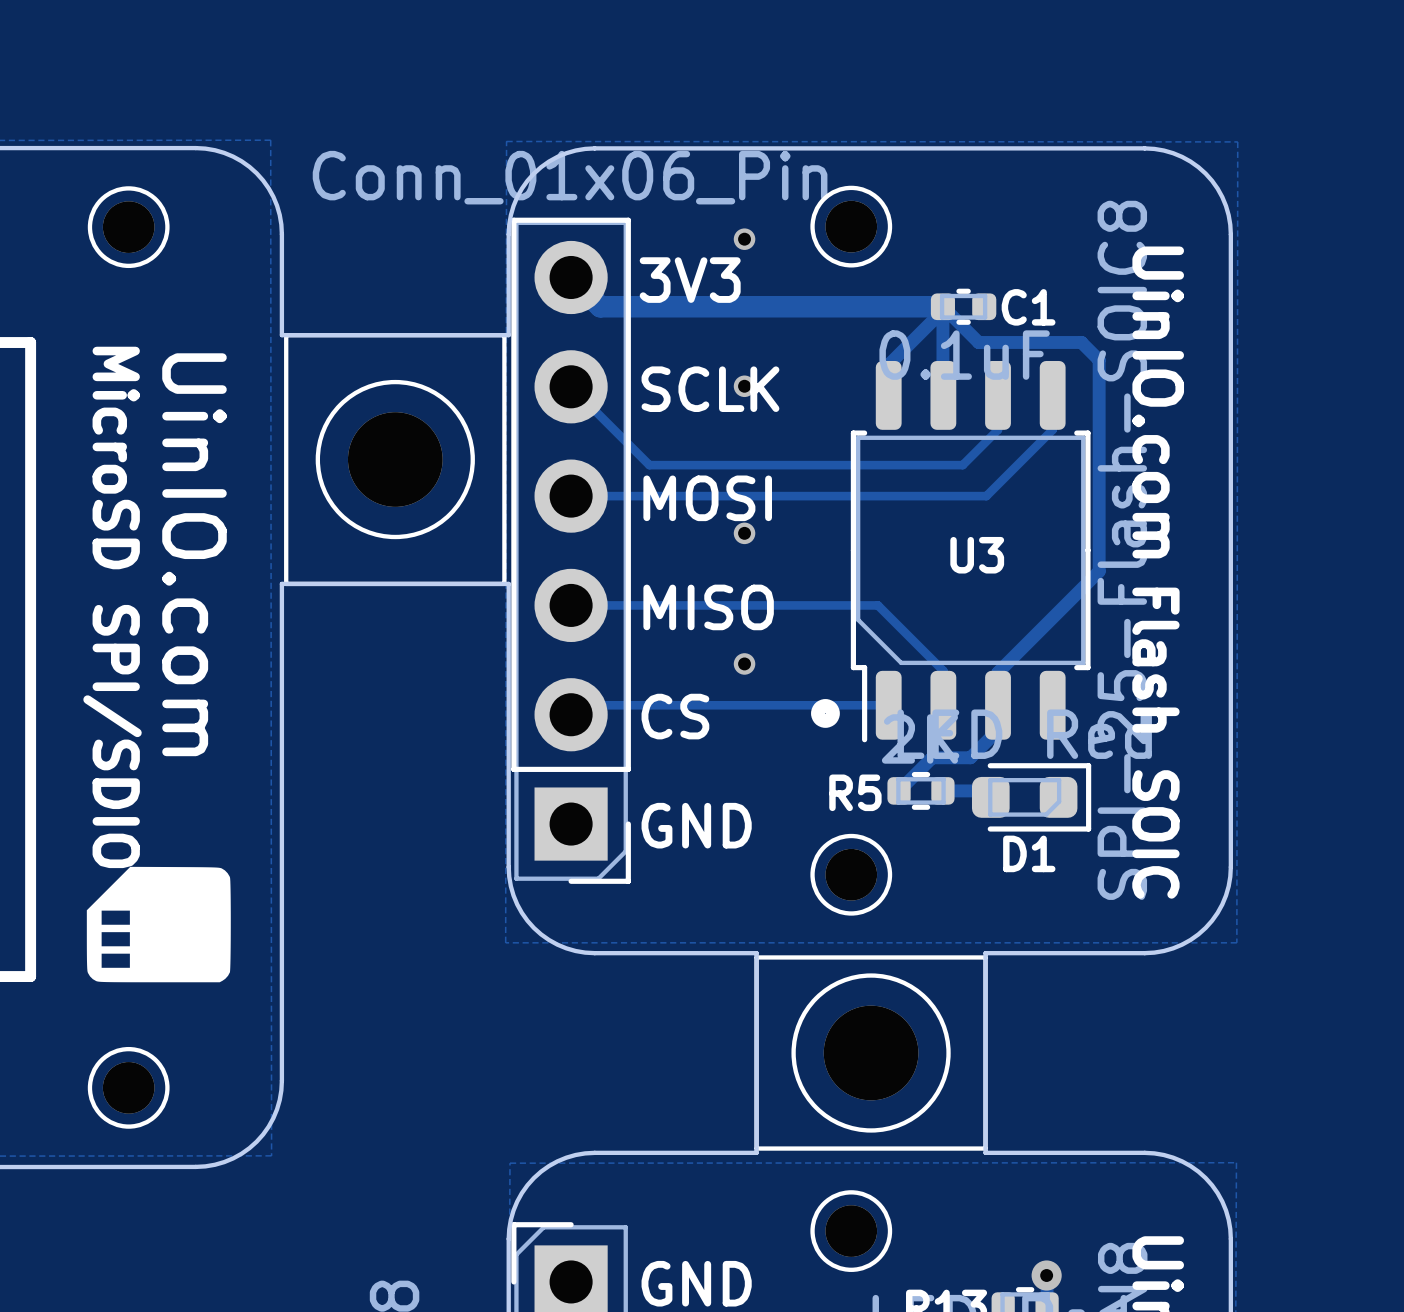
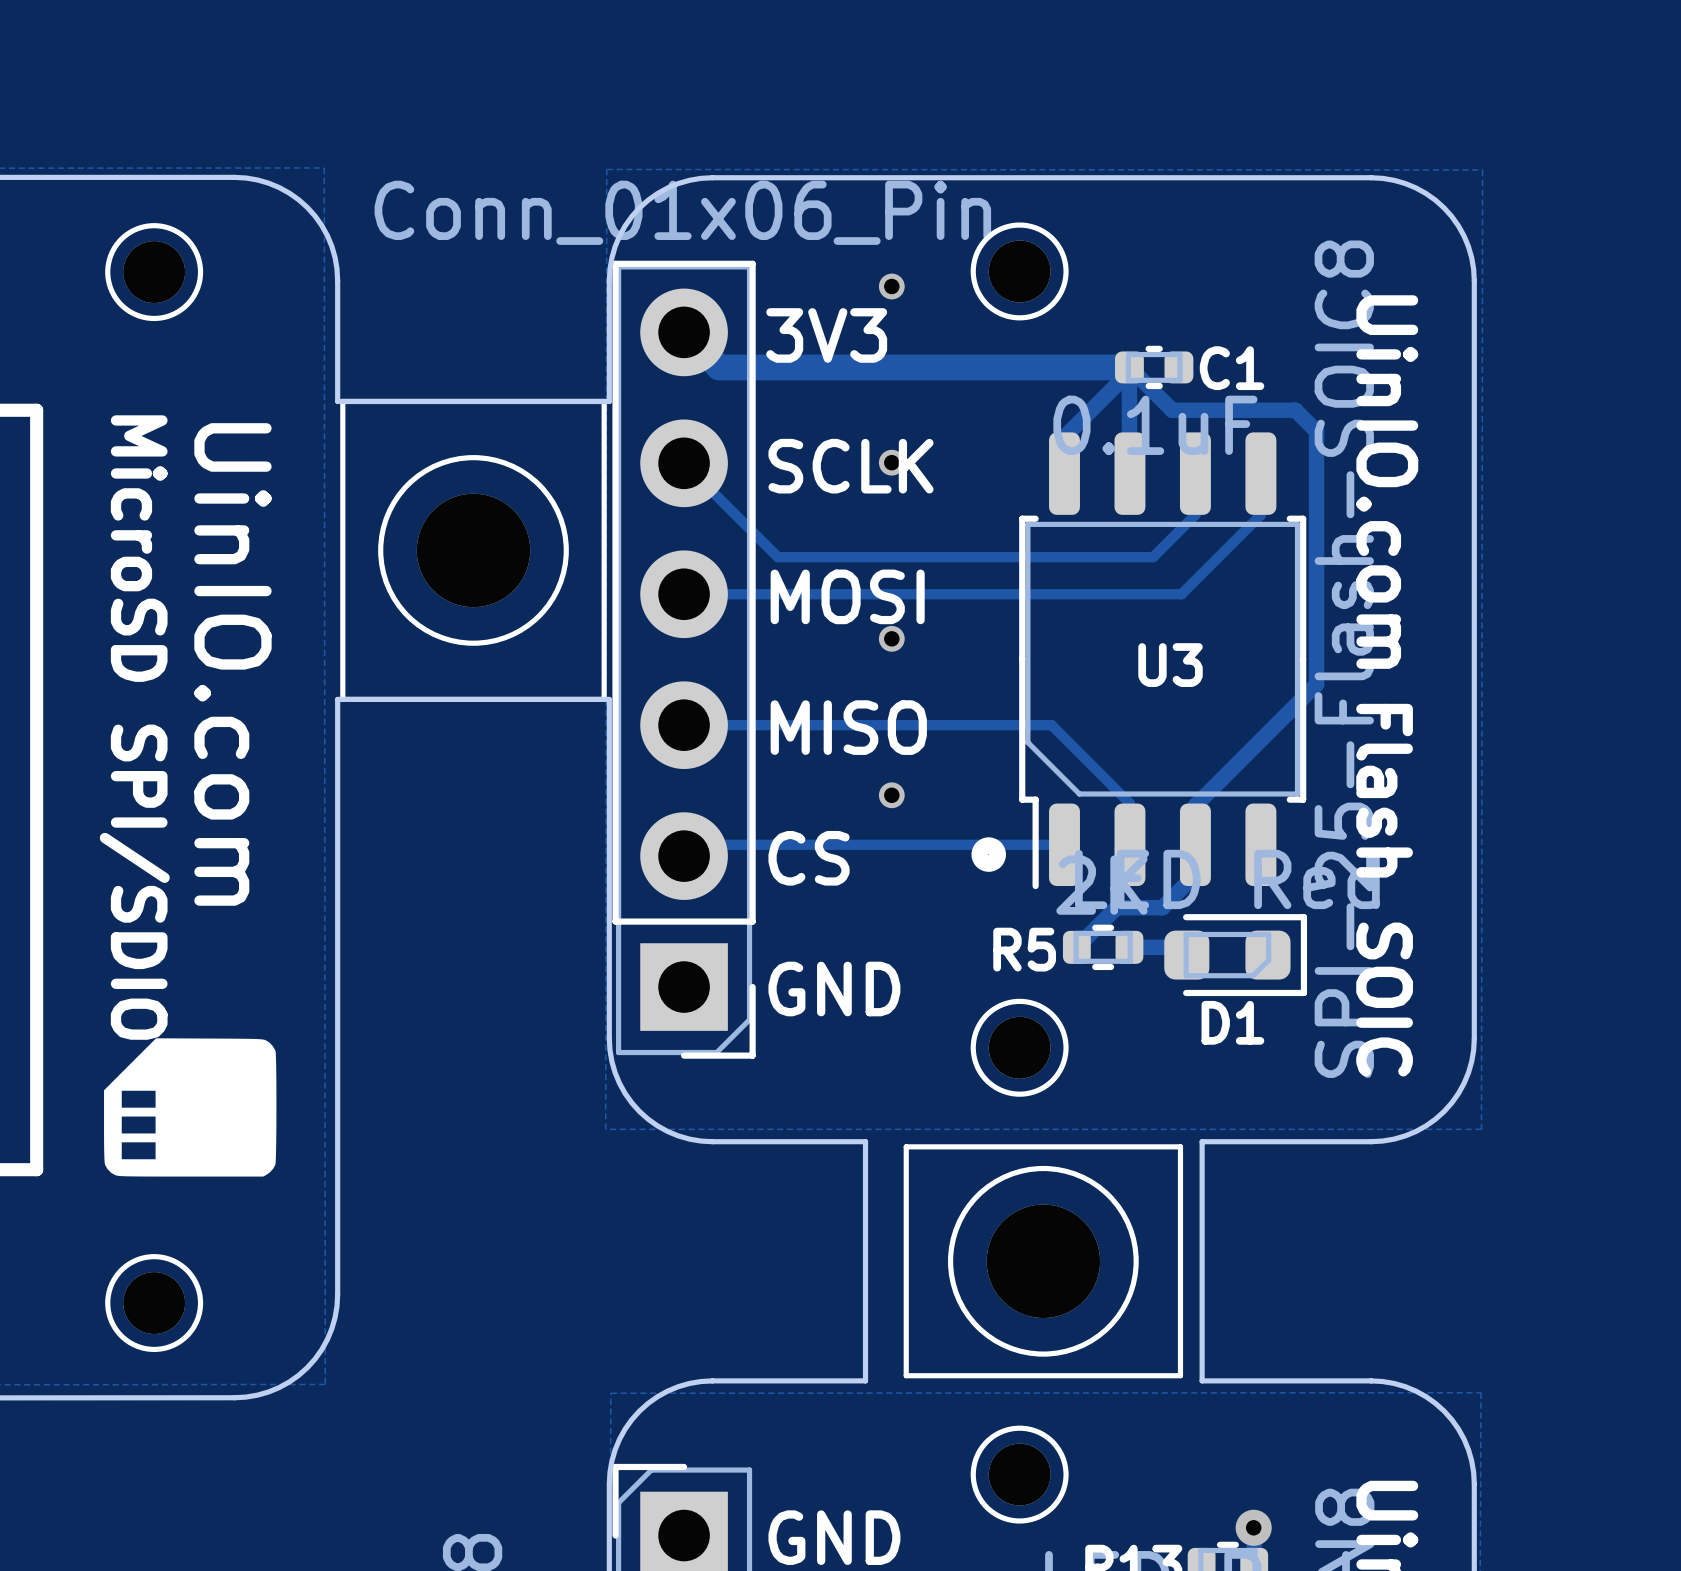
board edge: (722, 953) (756, 953) (756, 1152) (722, 1152) -> (865, 1141) (865, 1380)
board edge: (1003, 953) (985, 953) (985, 1152) (1003, 1152) -> (1202, 1141) (1202, 1380)

